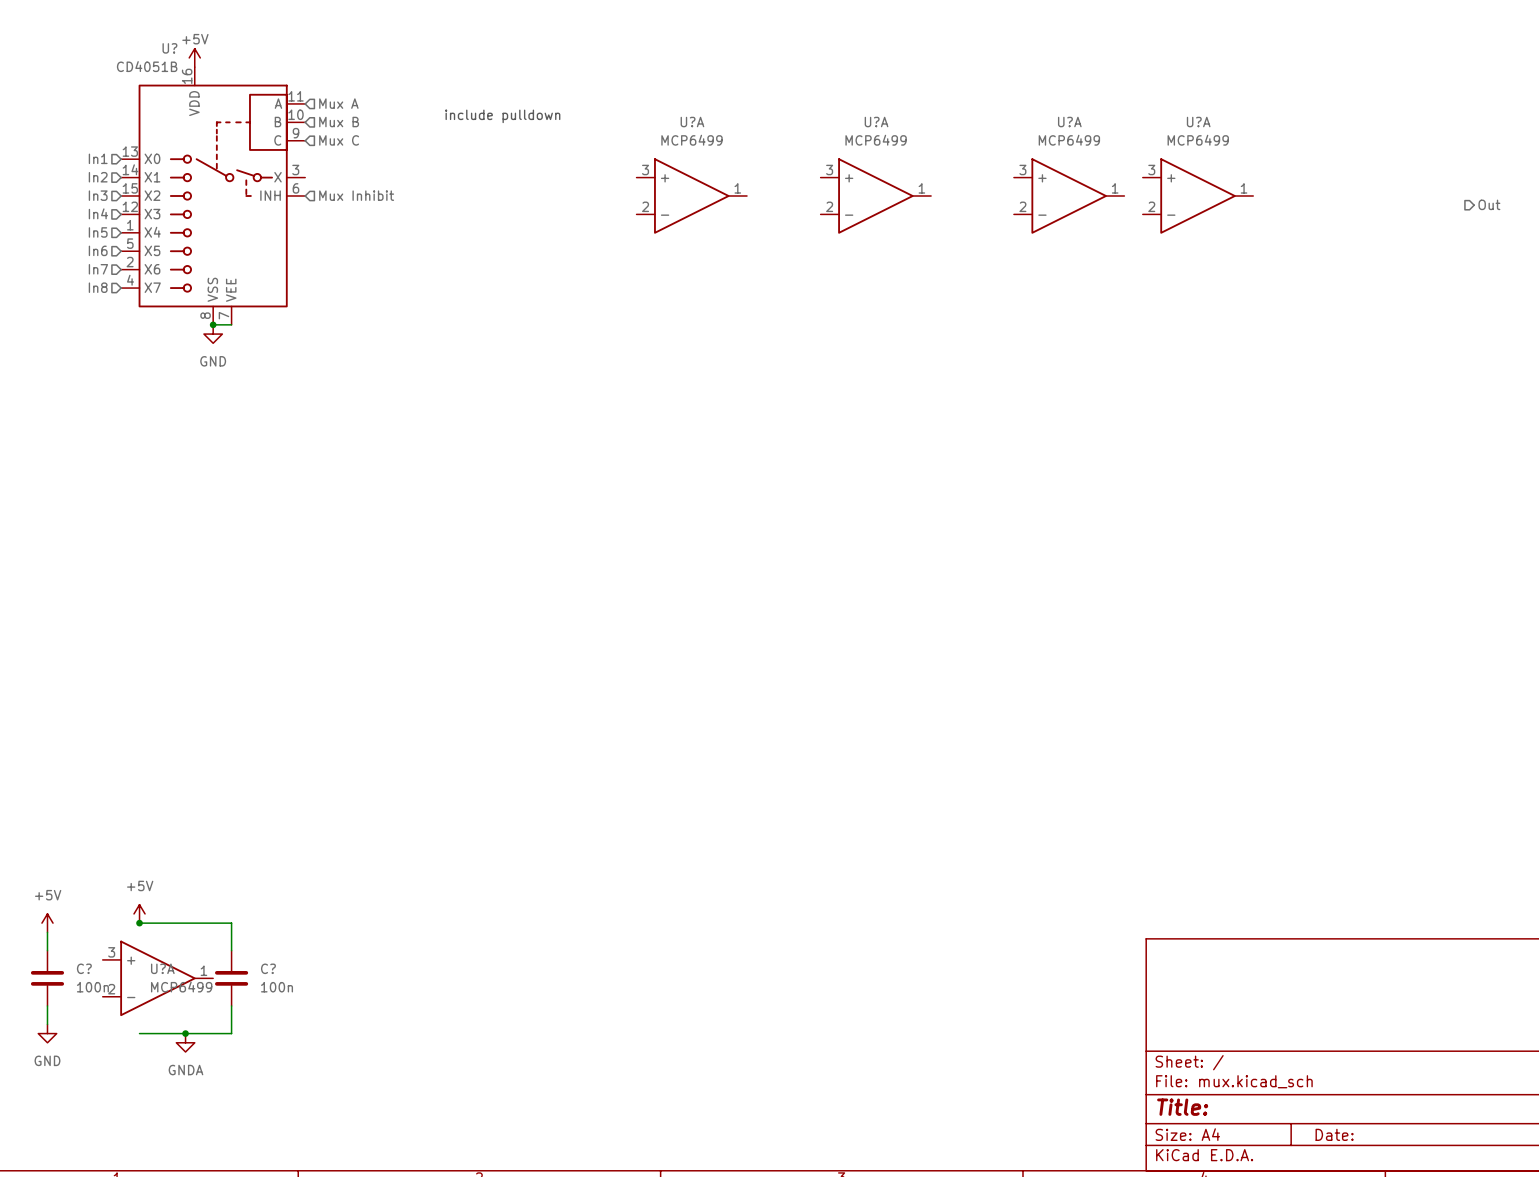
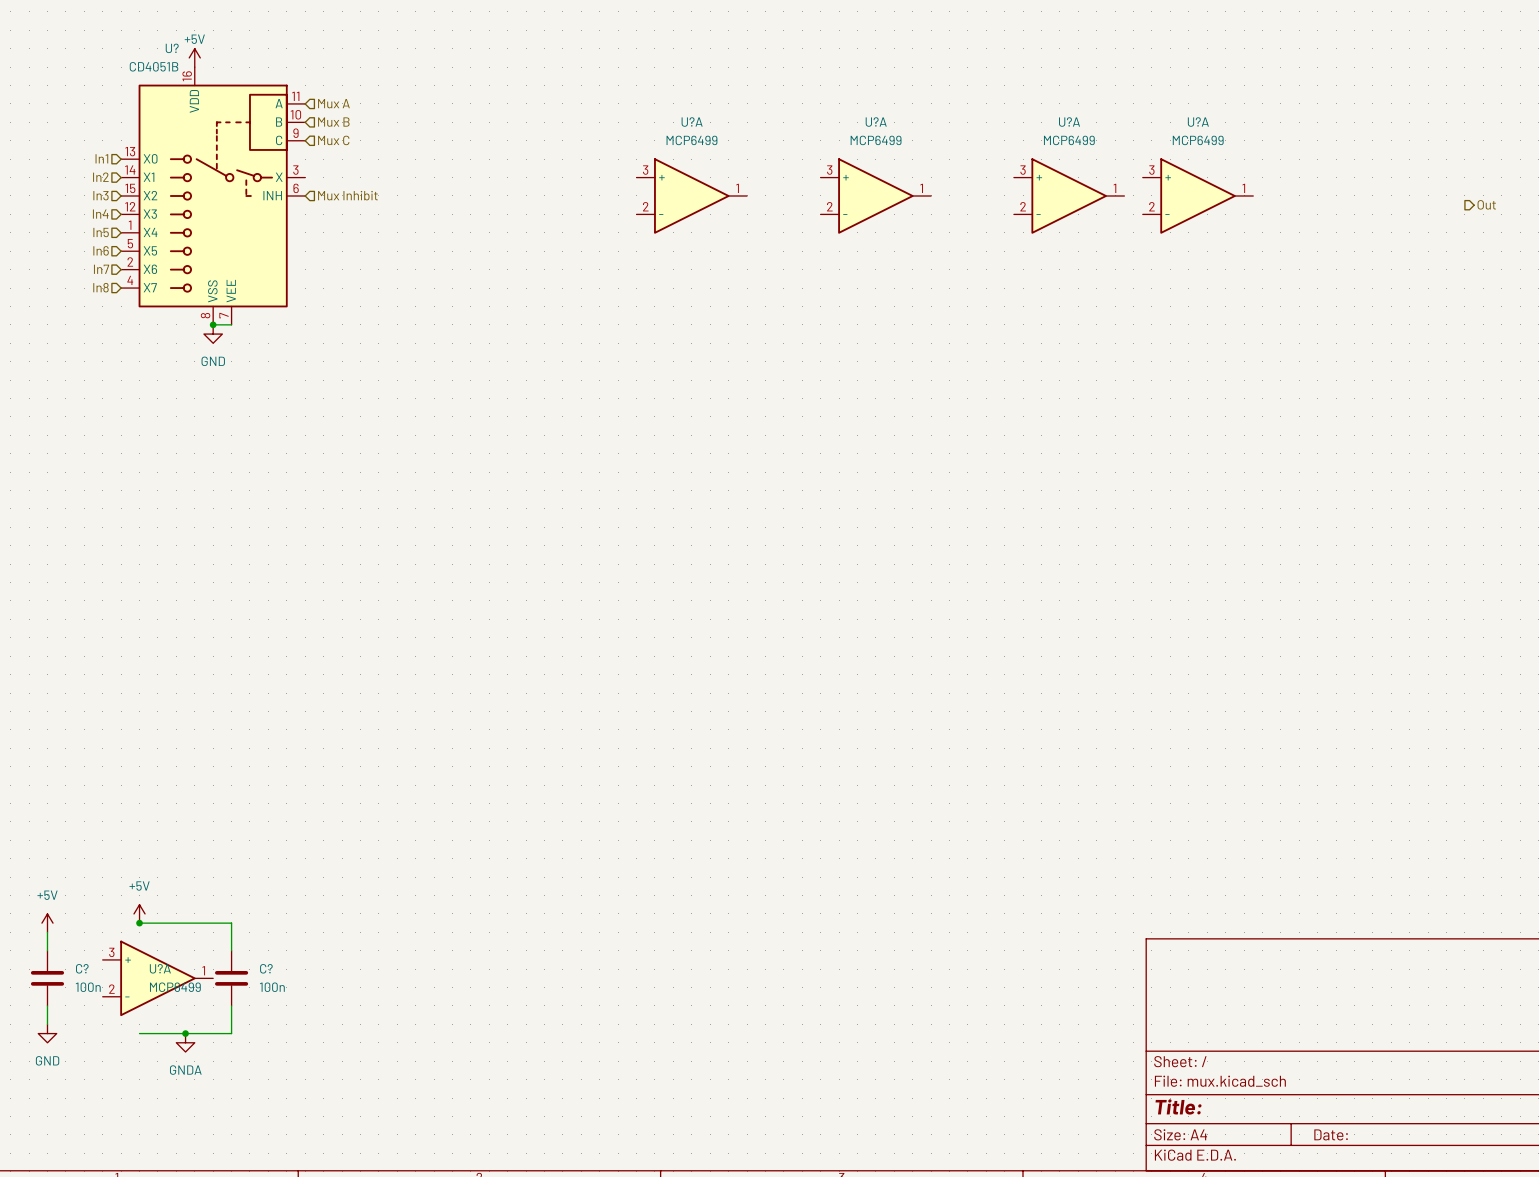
text: include pulldown (502, 116) -> none

